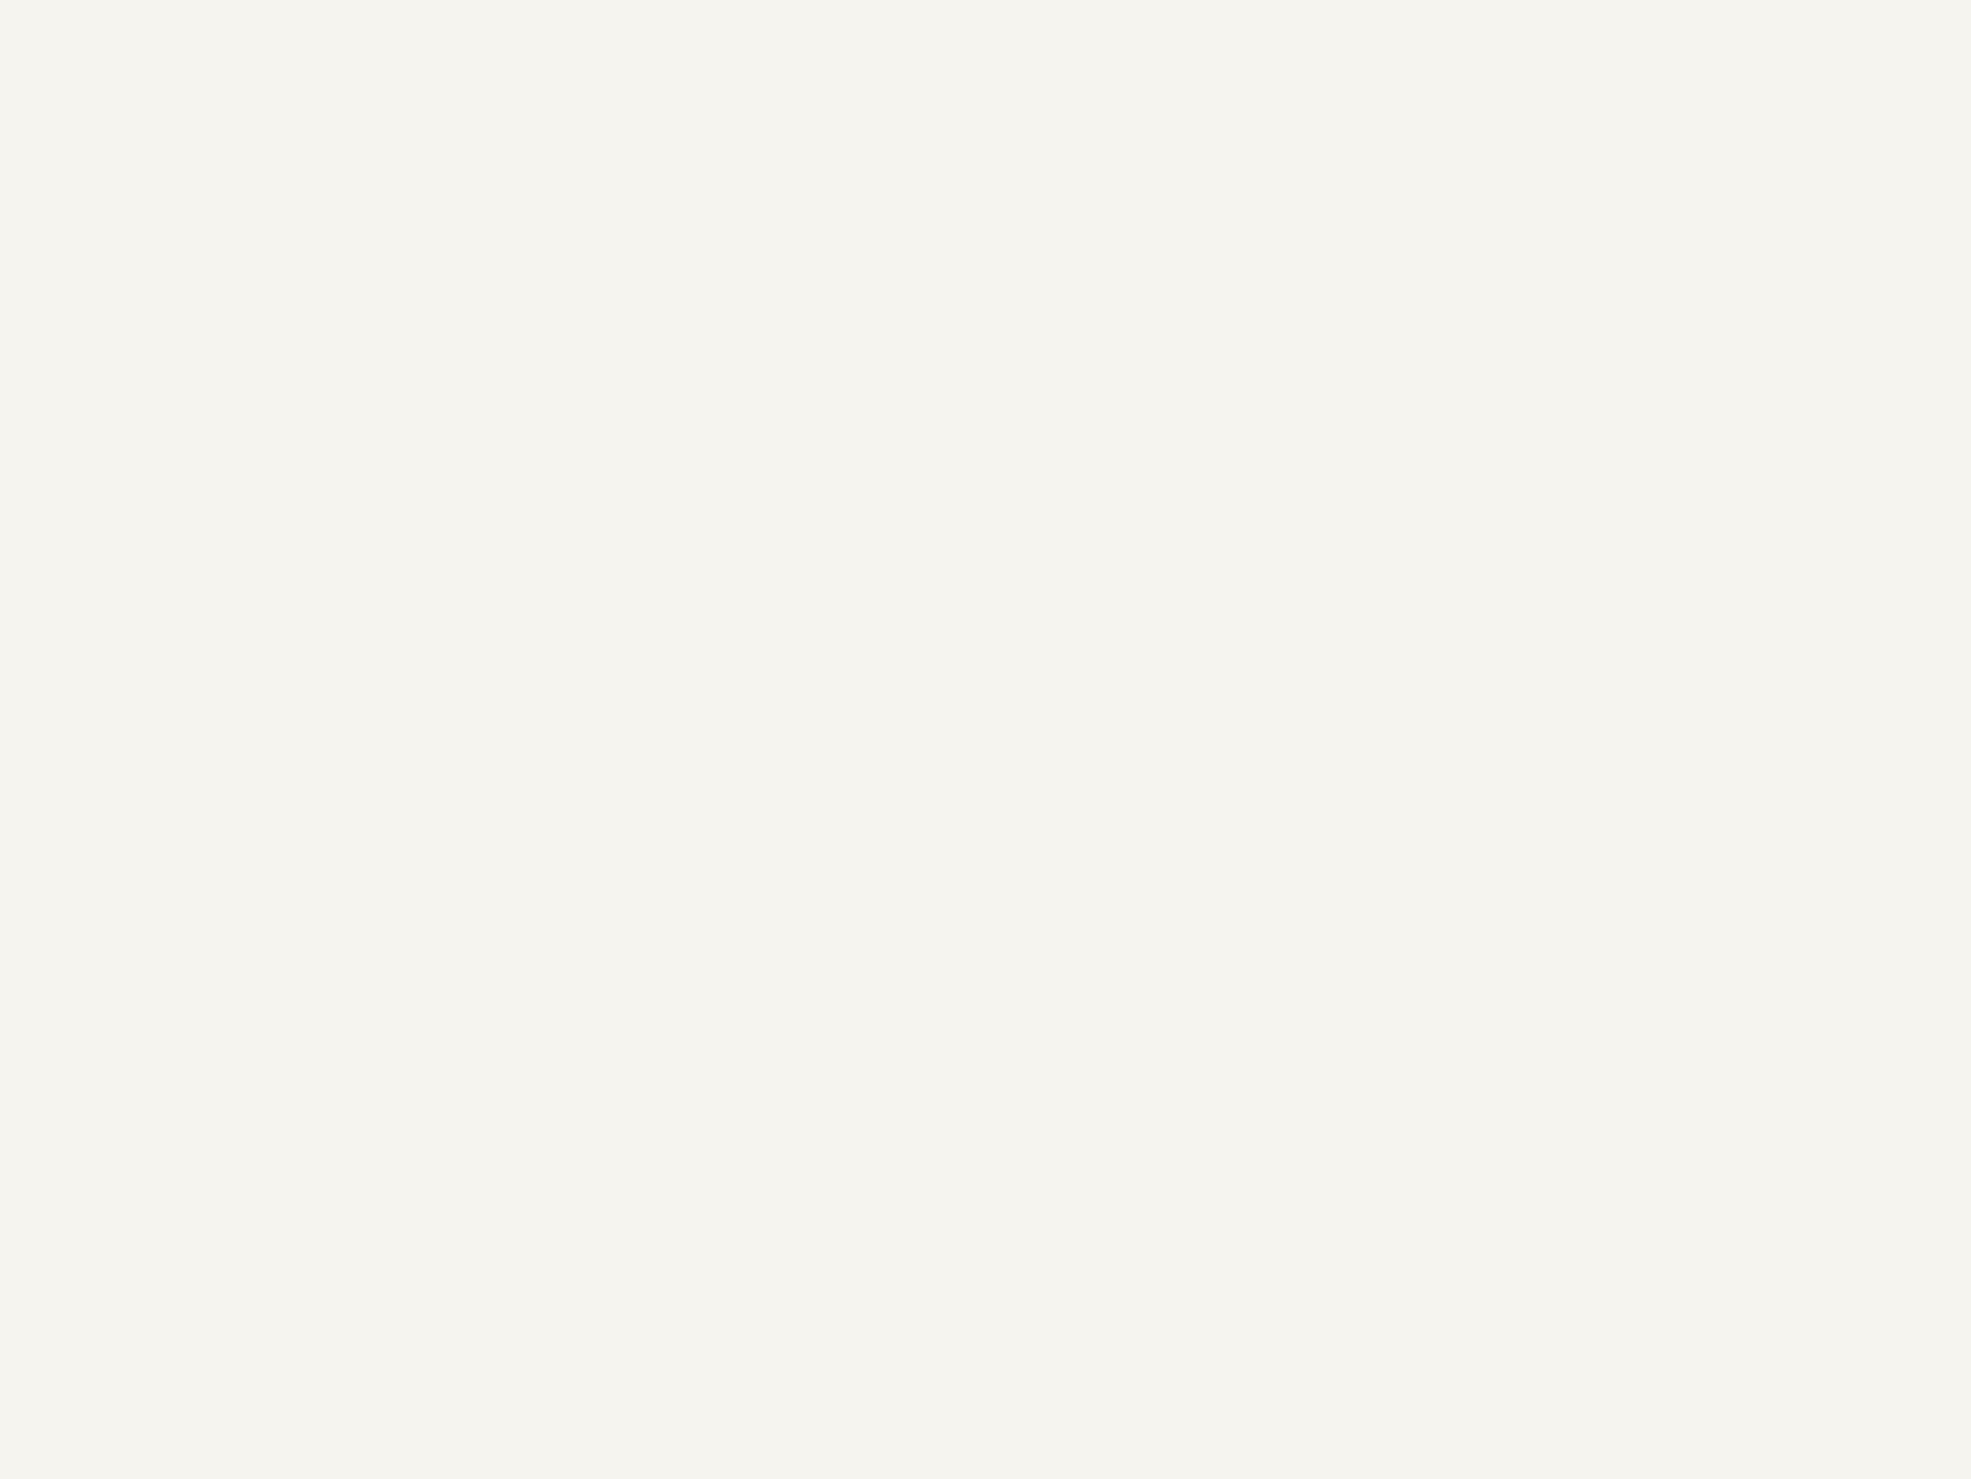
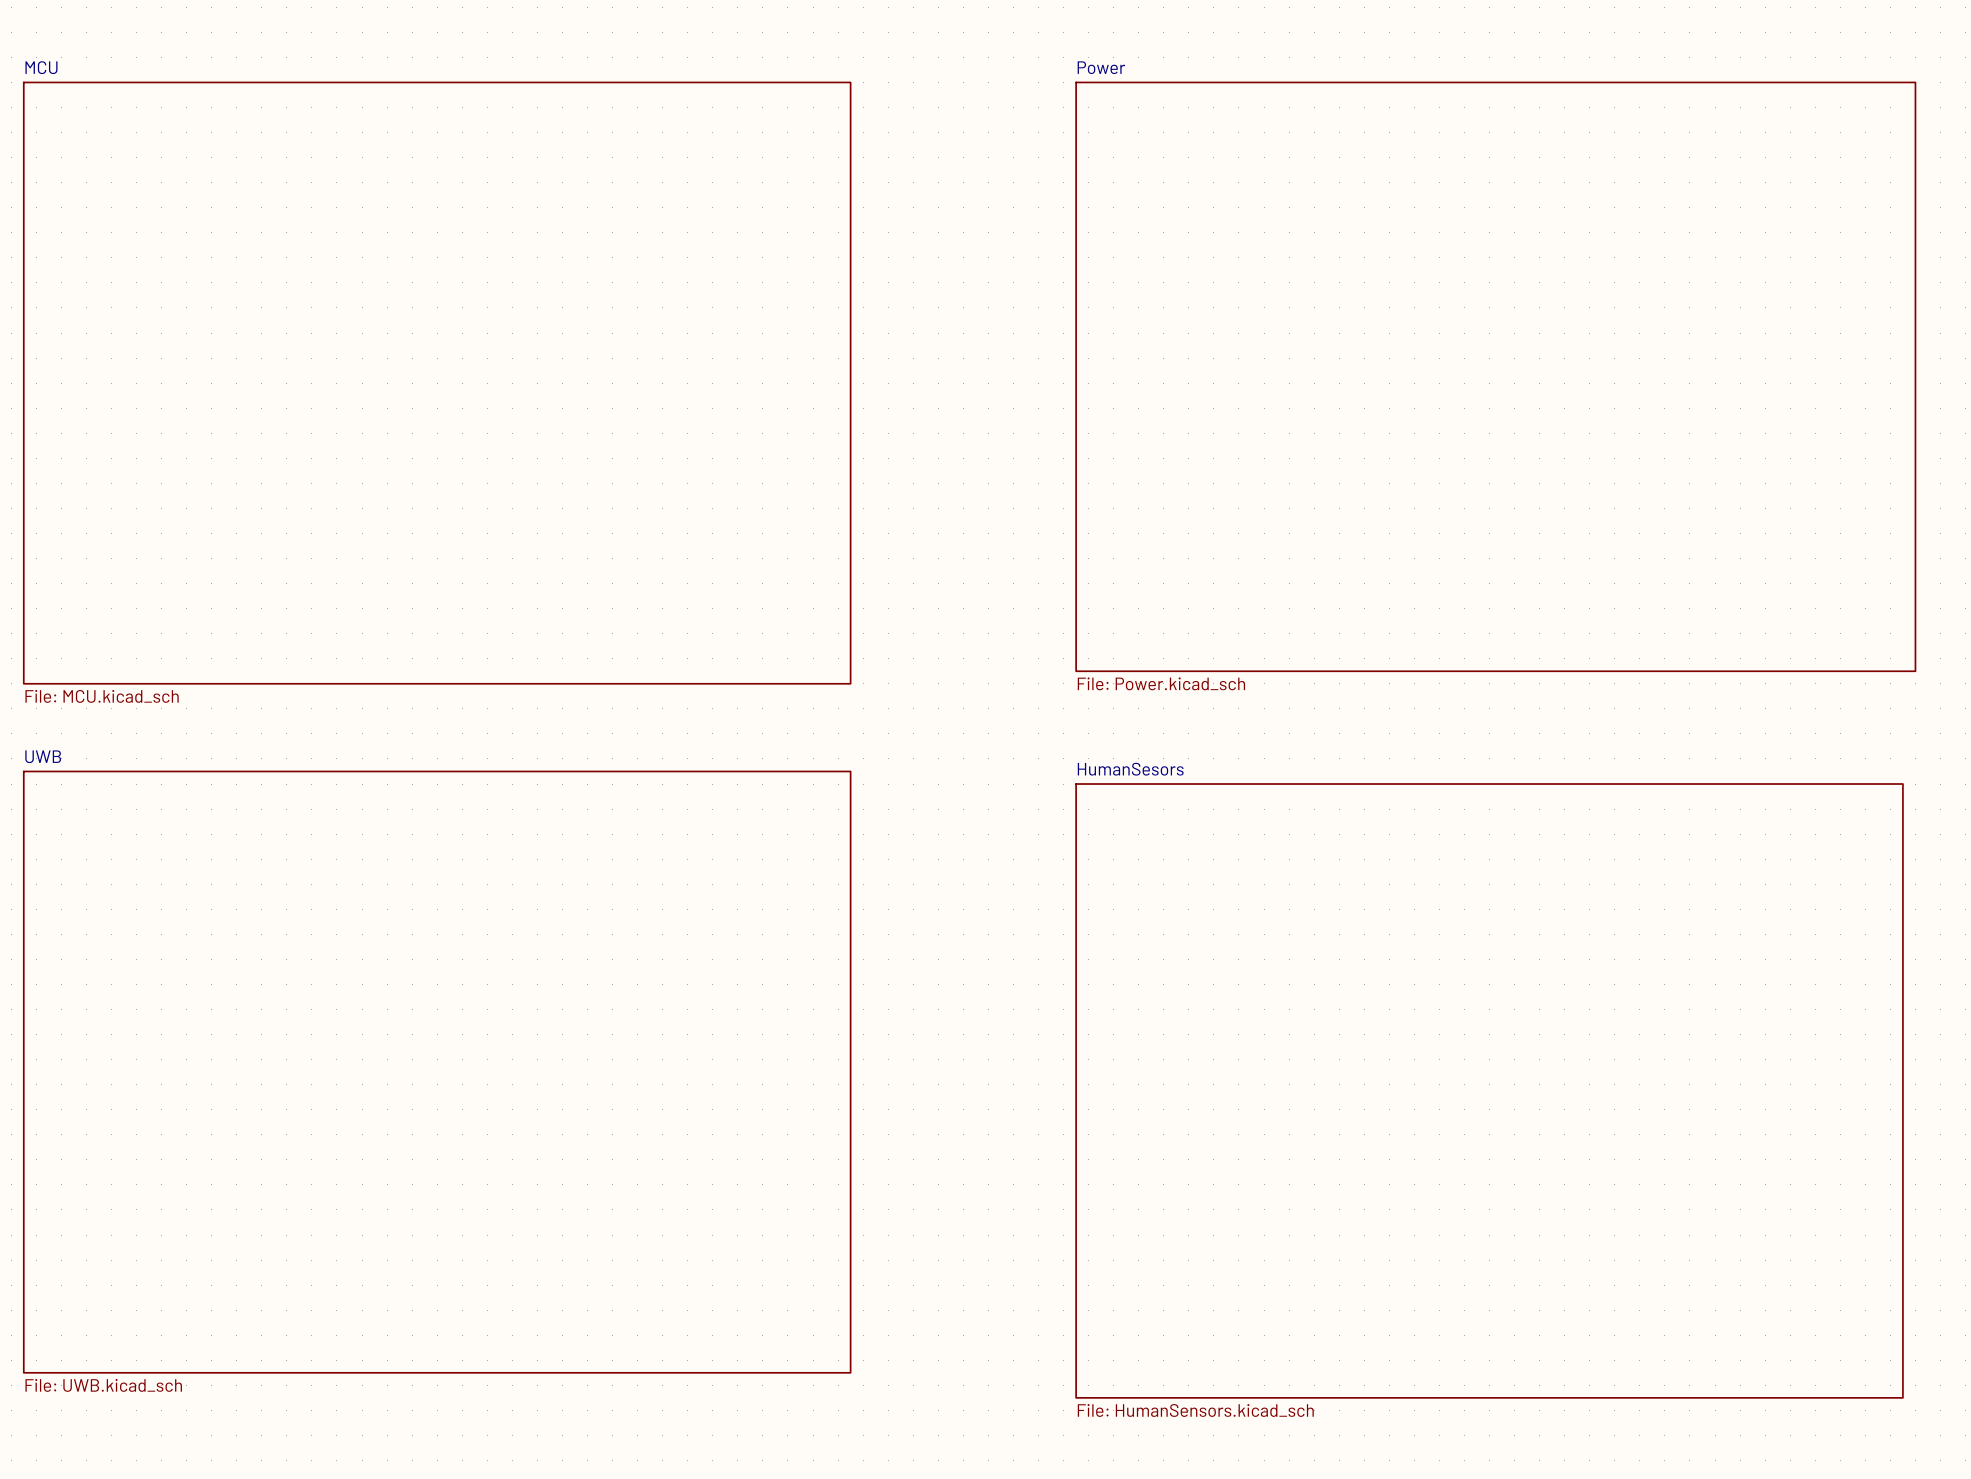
sheet Power: none -> File: Power.kicad_sch (1495, 376)
sheet MCU: none -> File: MCU.kicad_sch (437, 383)
sheet UWB: none -> File: UWB.kicad_sch (437, 1072)
sheet HumanSesors: none -> File: HumanSensors.kicad_sch (1489, 1090)

